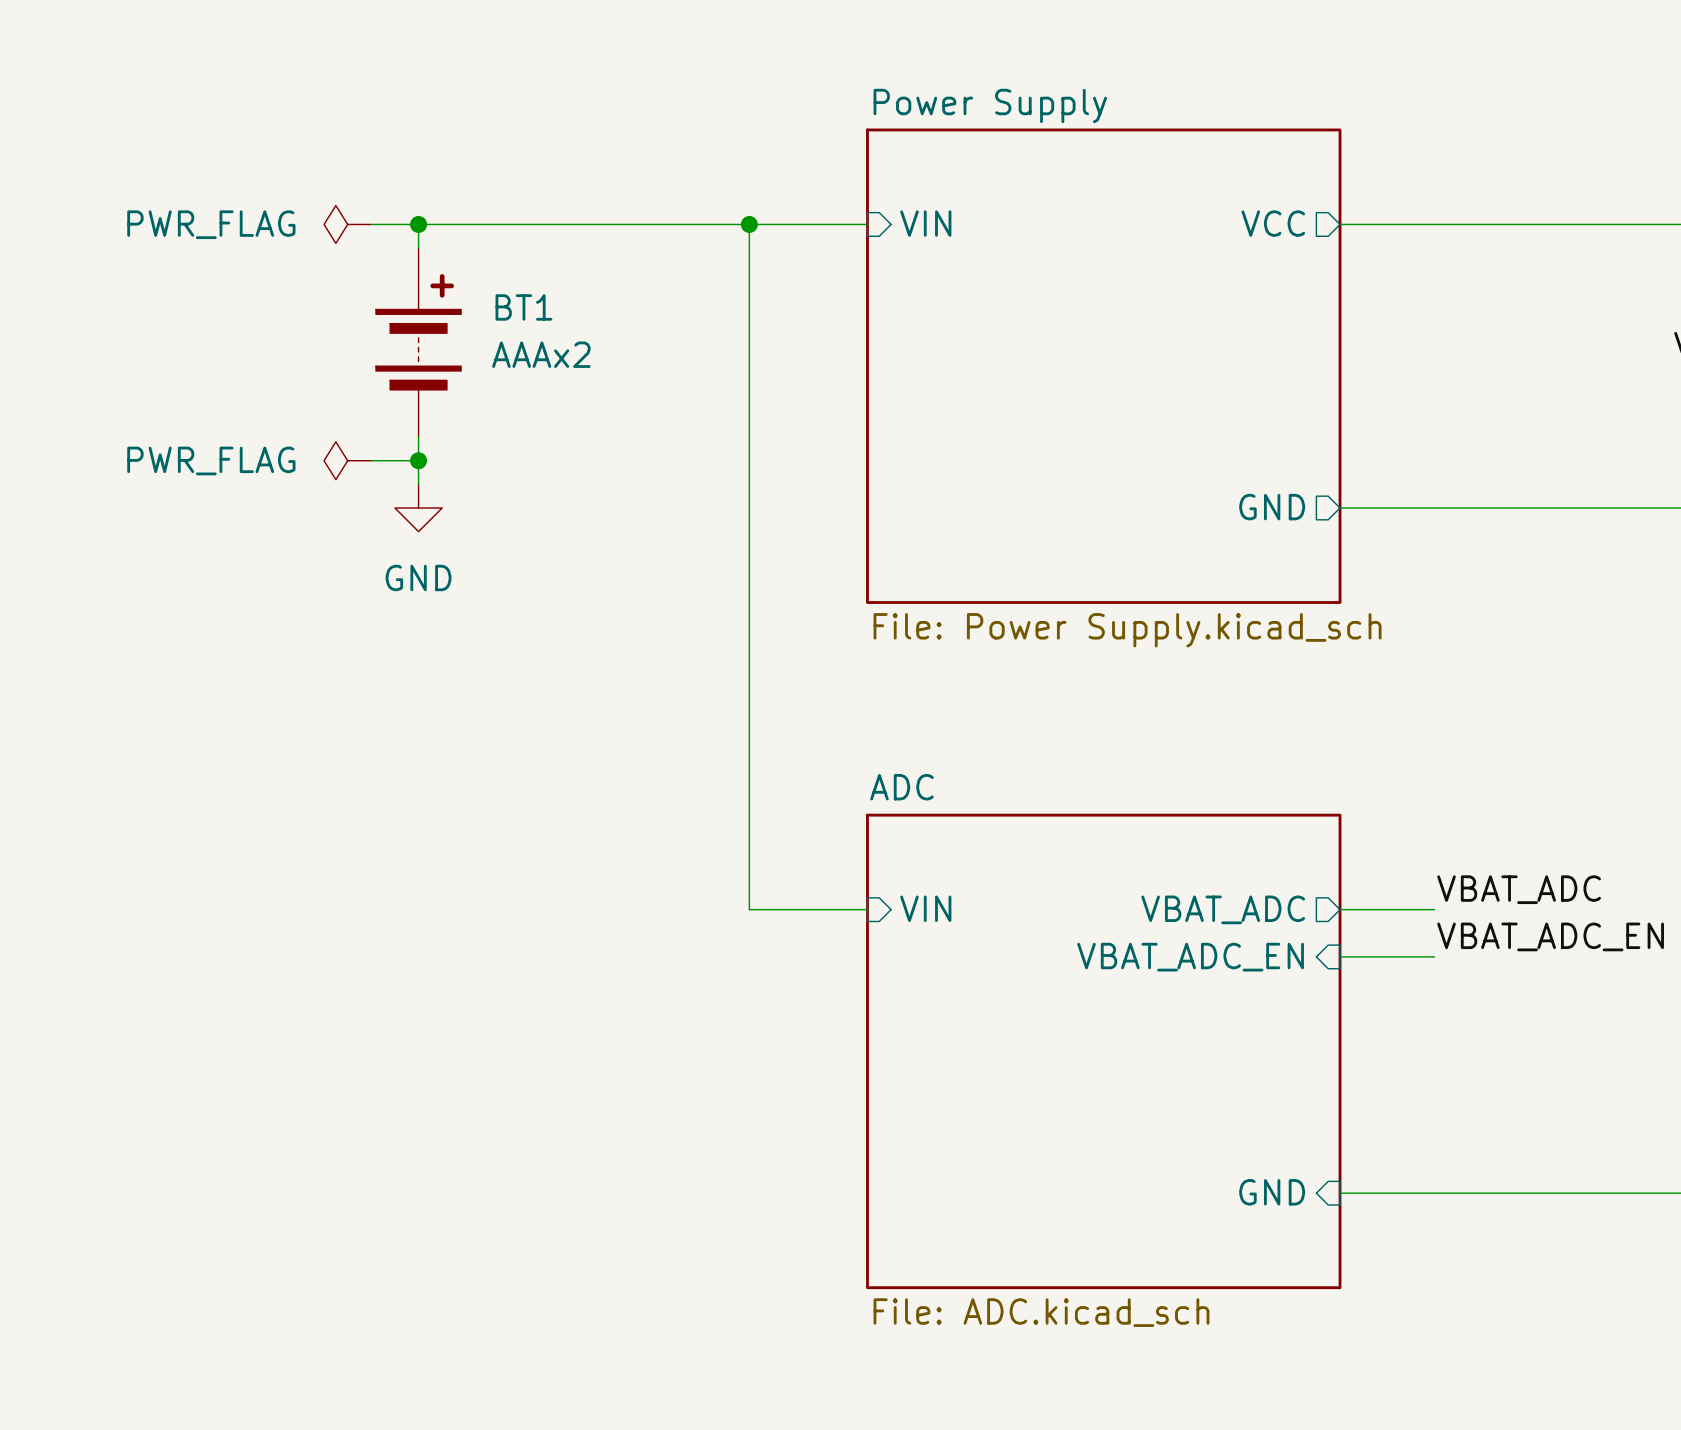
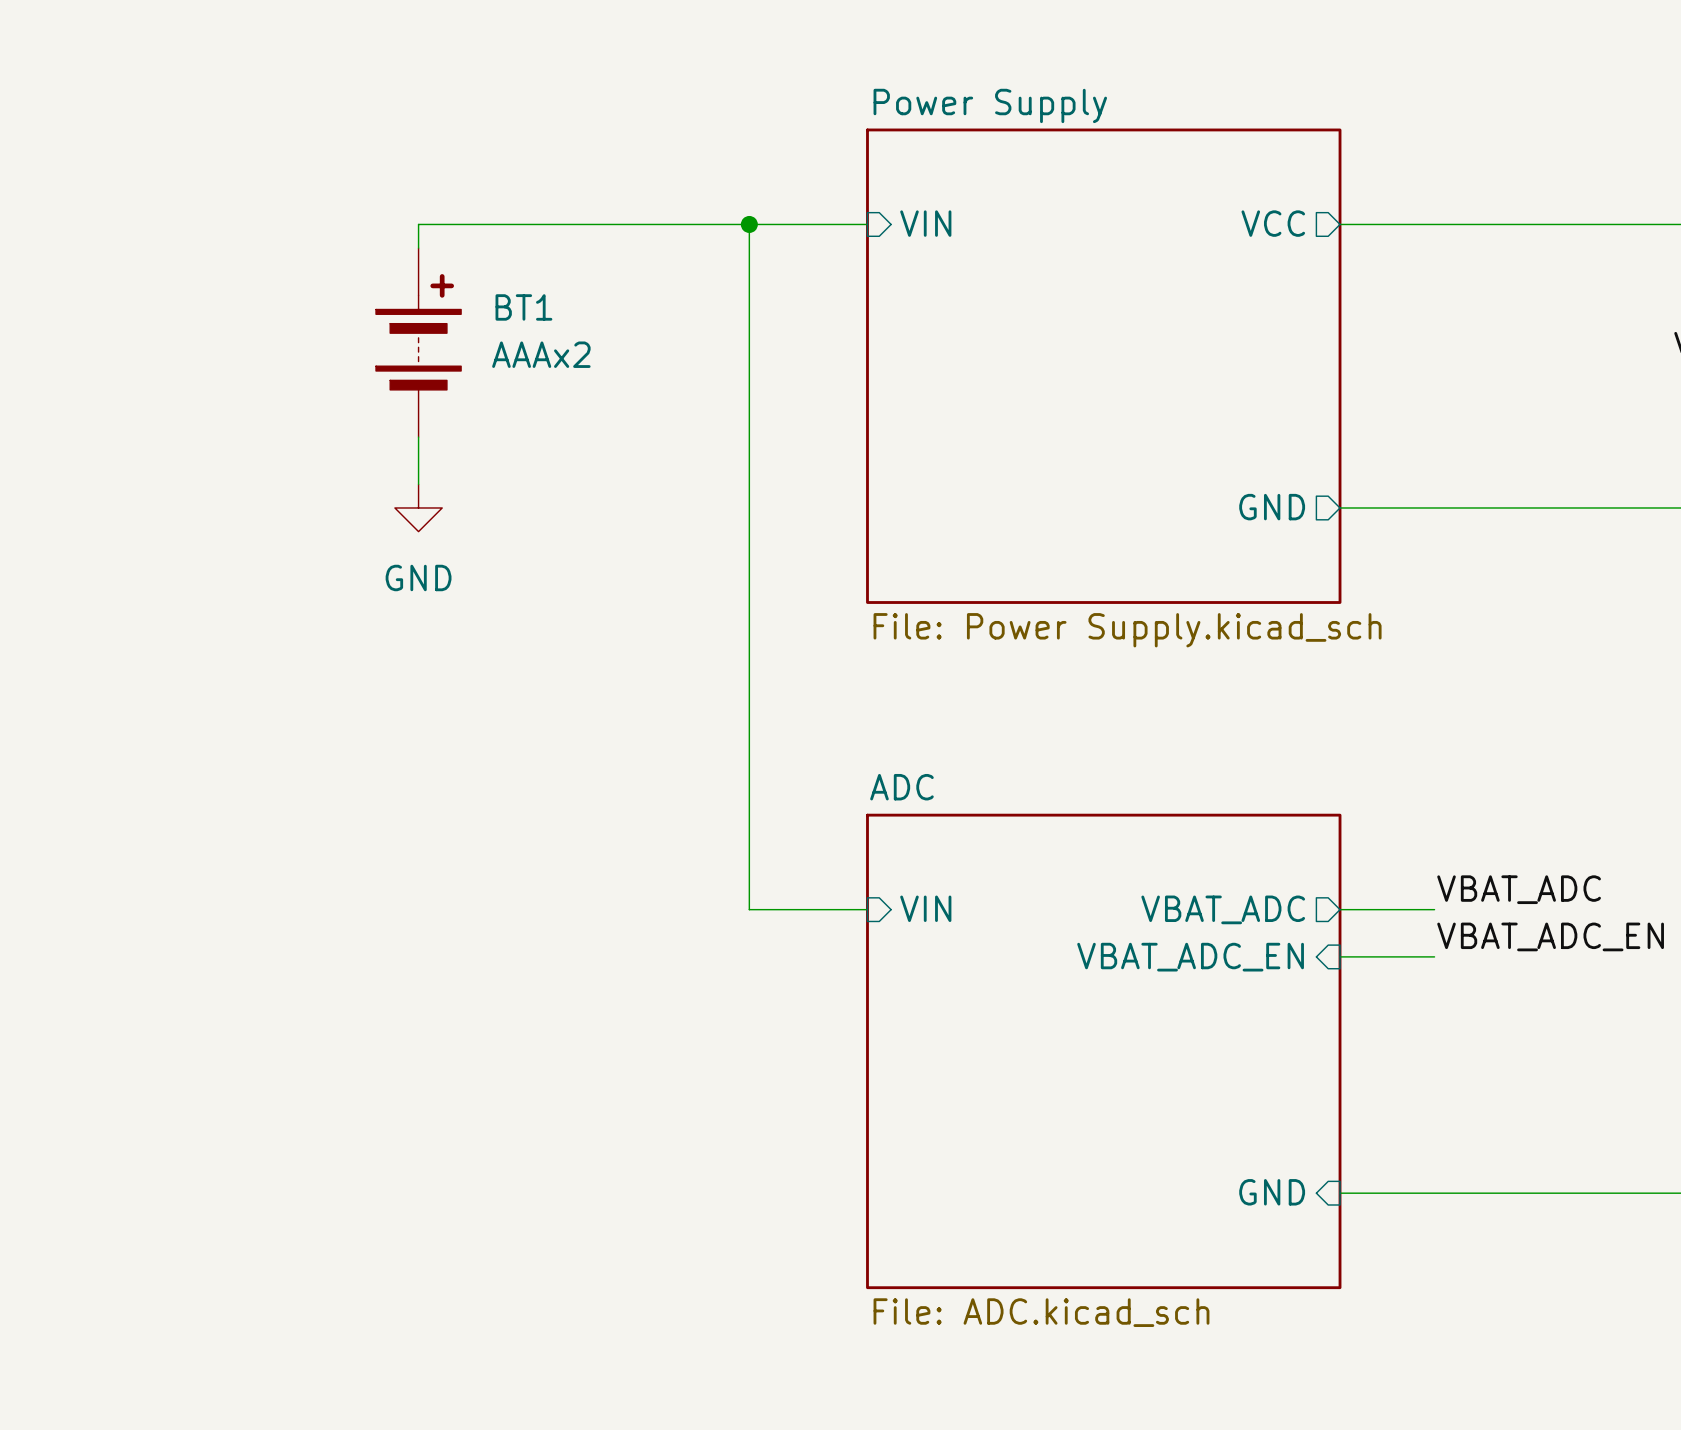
power symbol: PWR_FLAG (347, 224) -> none
wire: (371, 224) (418, 224) -> none
junction: (418, 224) -> none
power symbol: PWR_FLAG (347, 460) -> none
wire: (371, 460) (418, 460) -> none
junction: (418, 460) -> none

